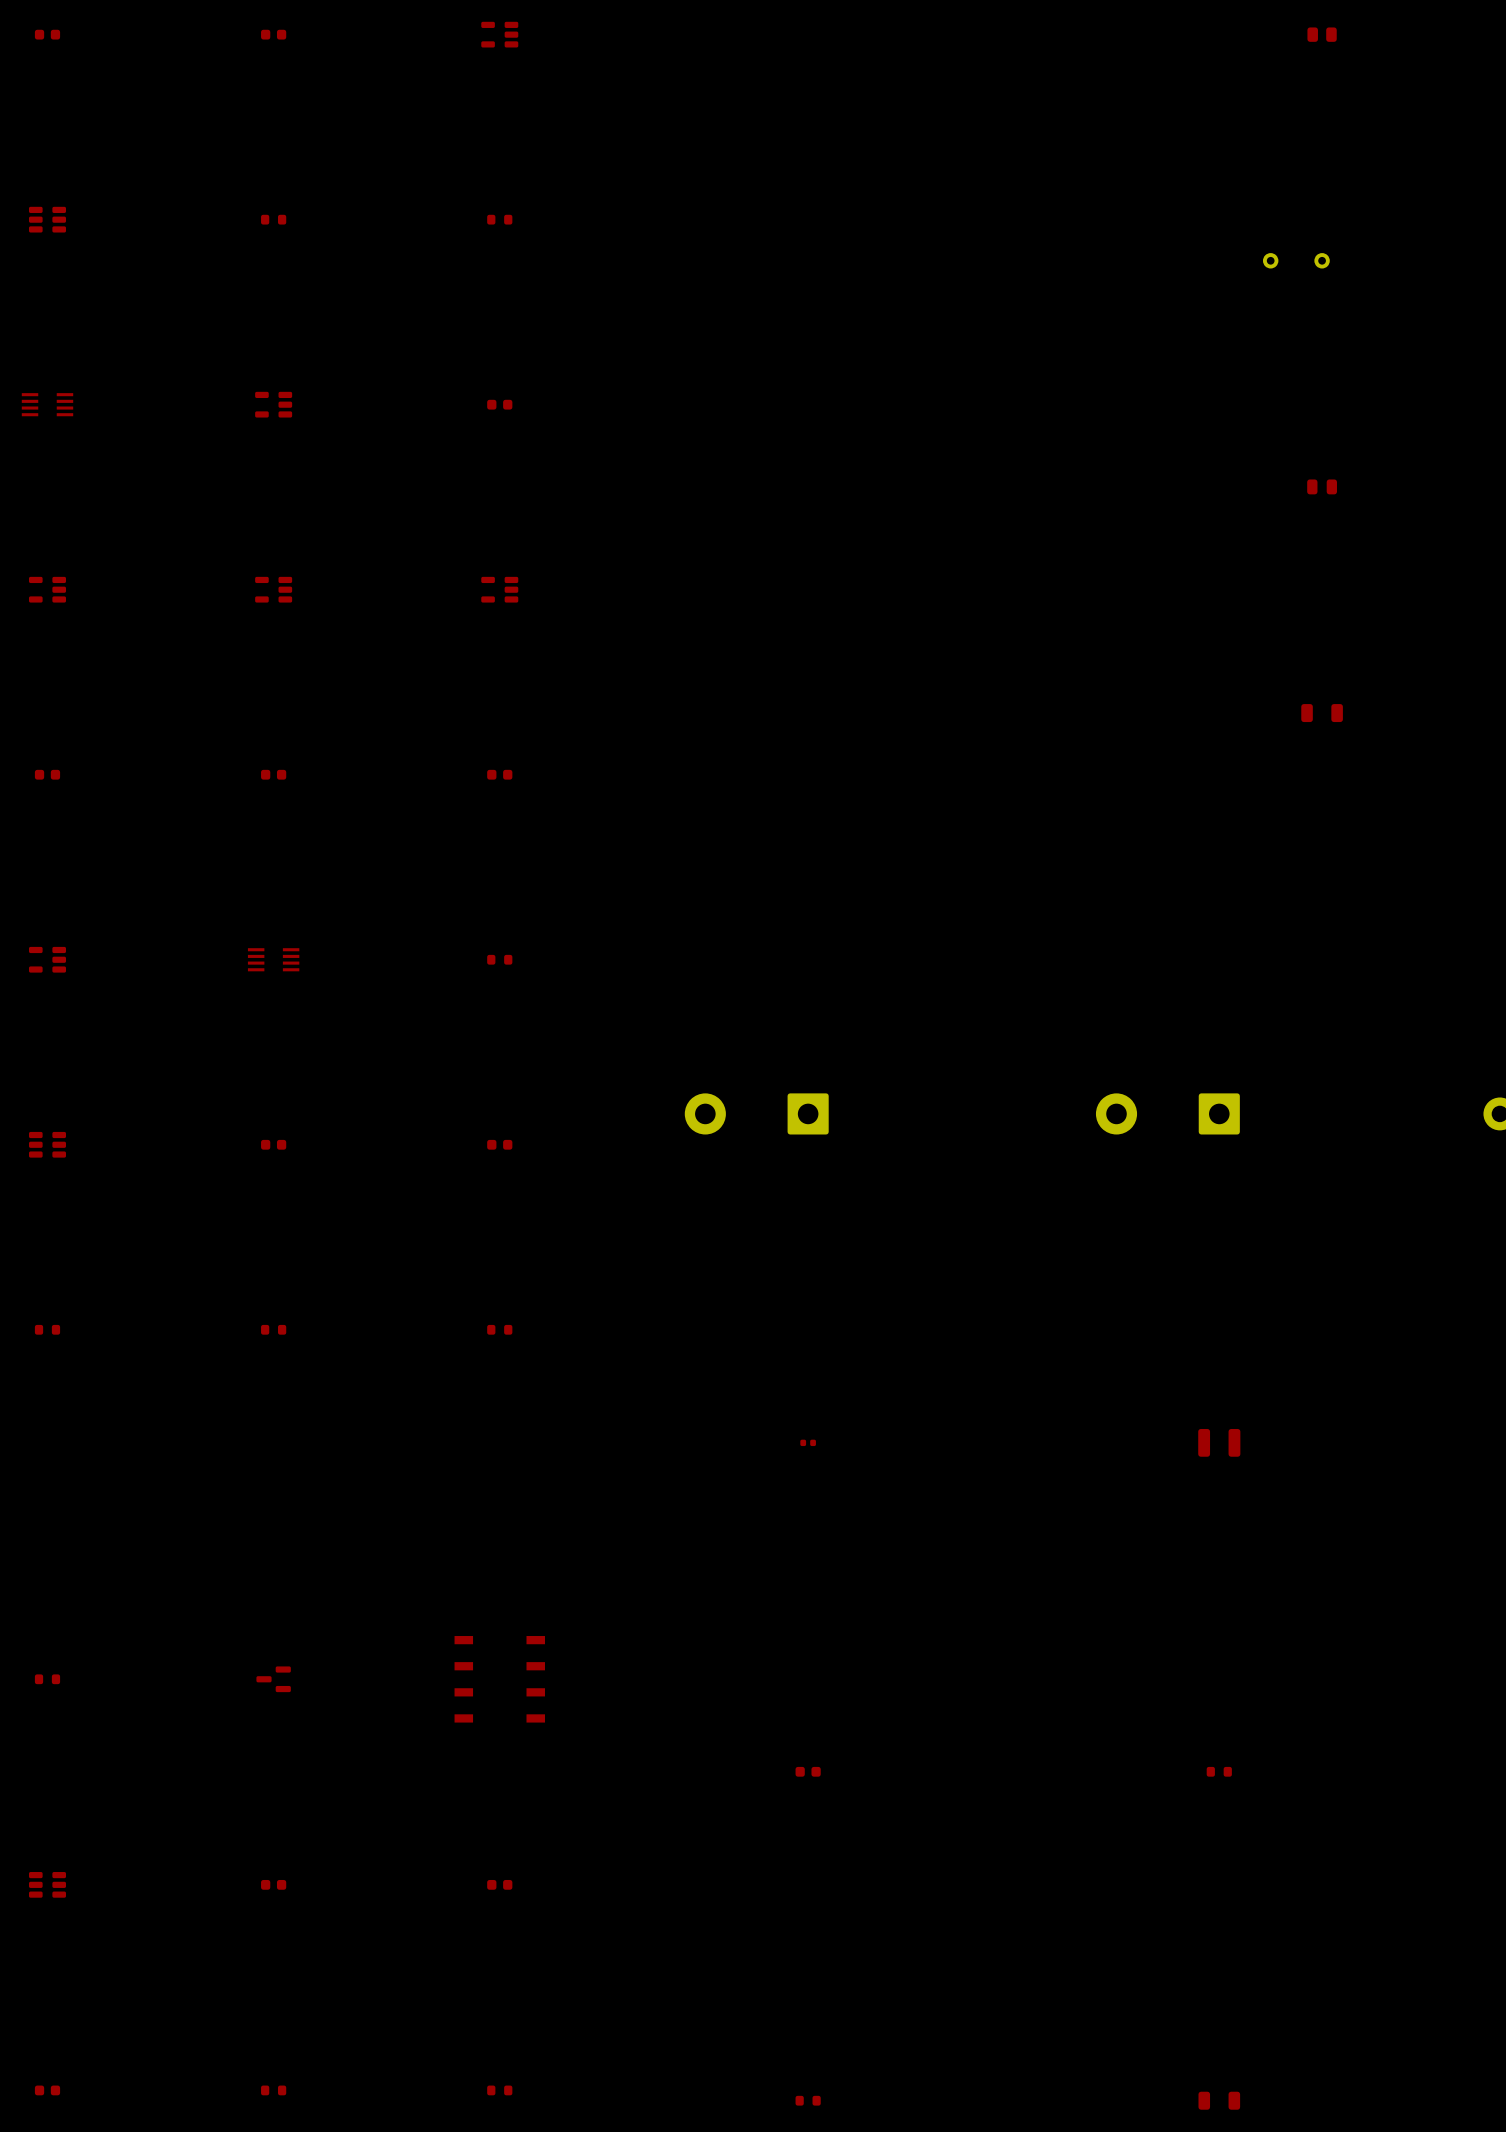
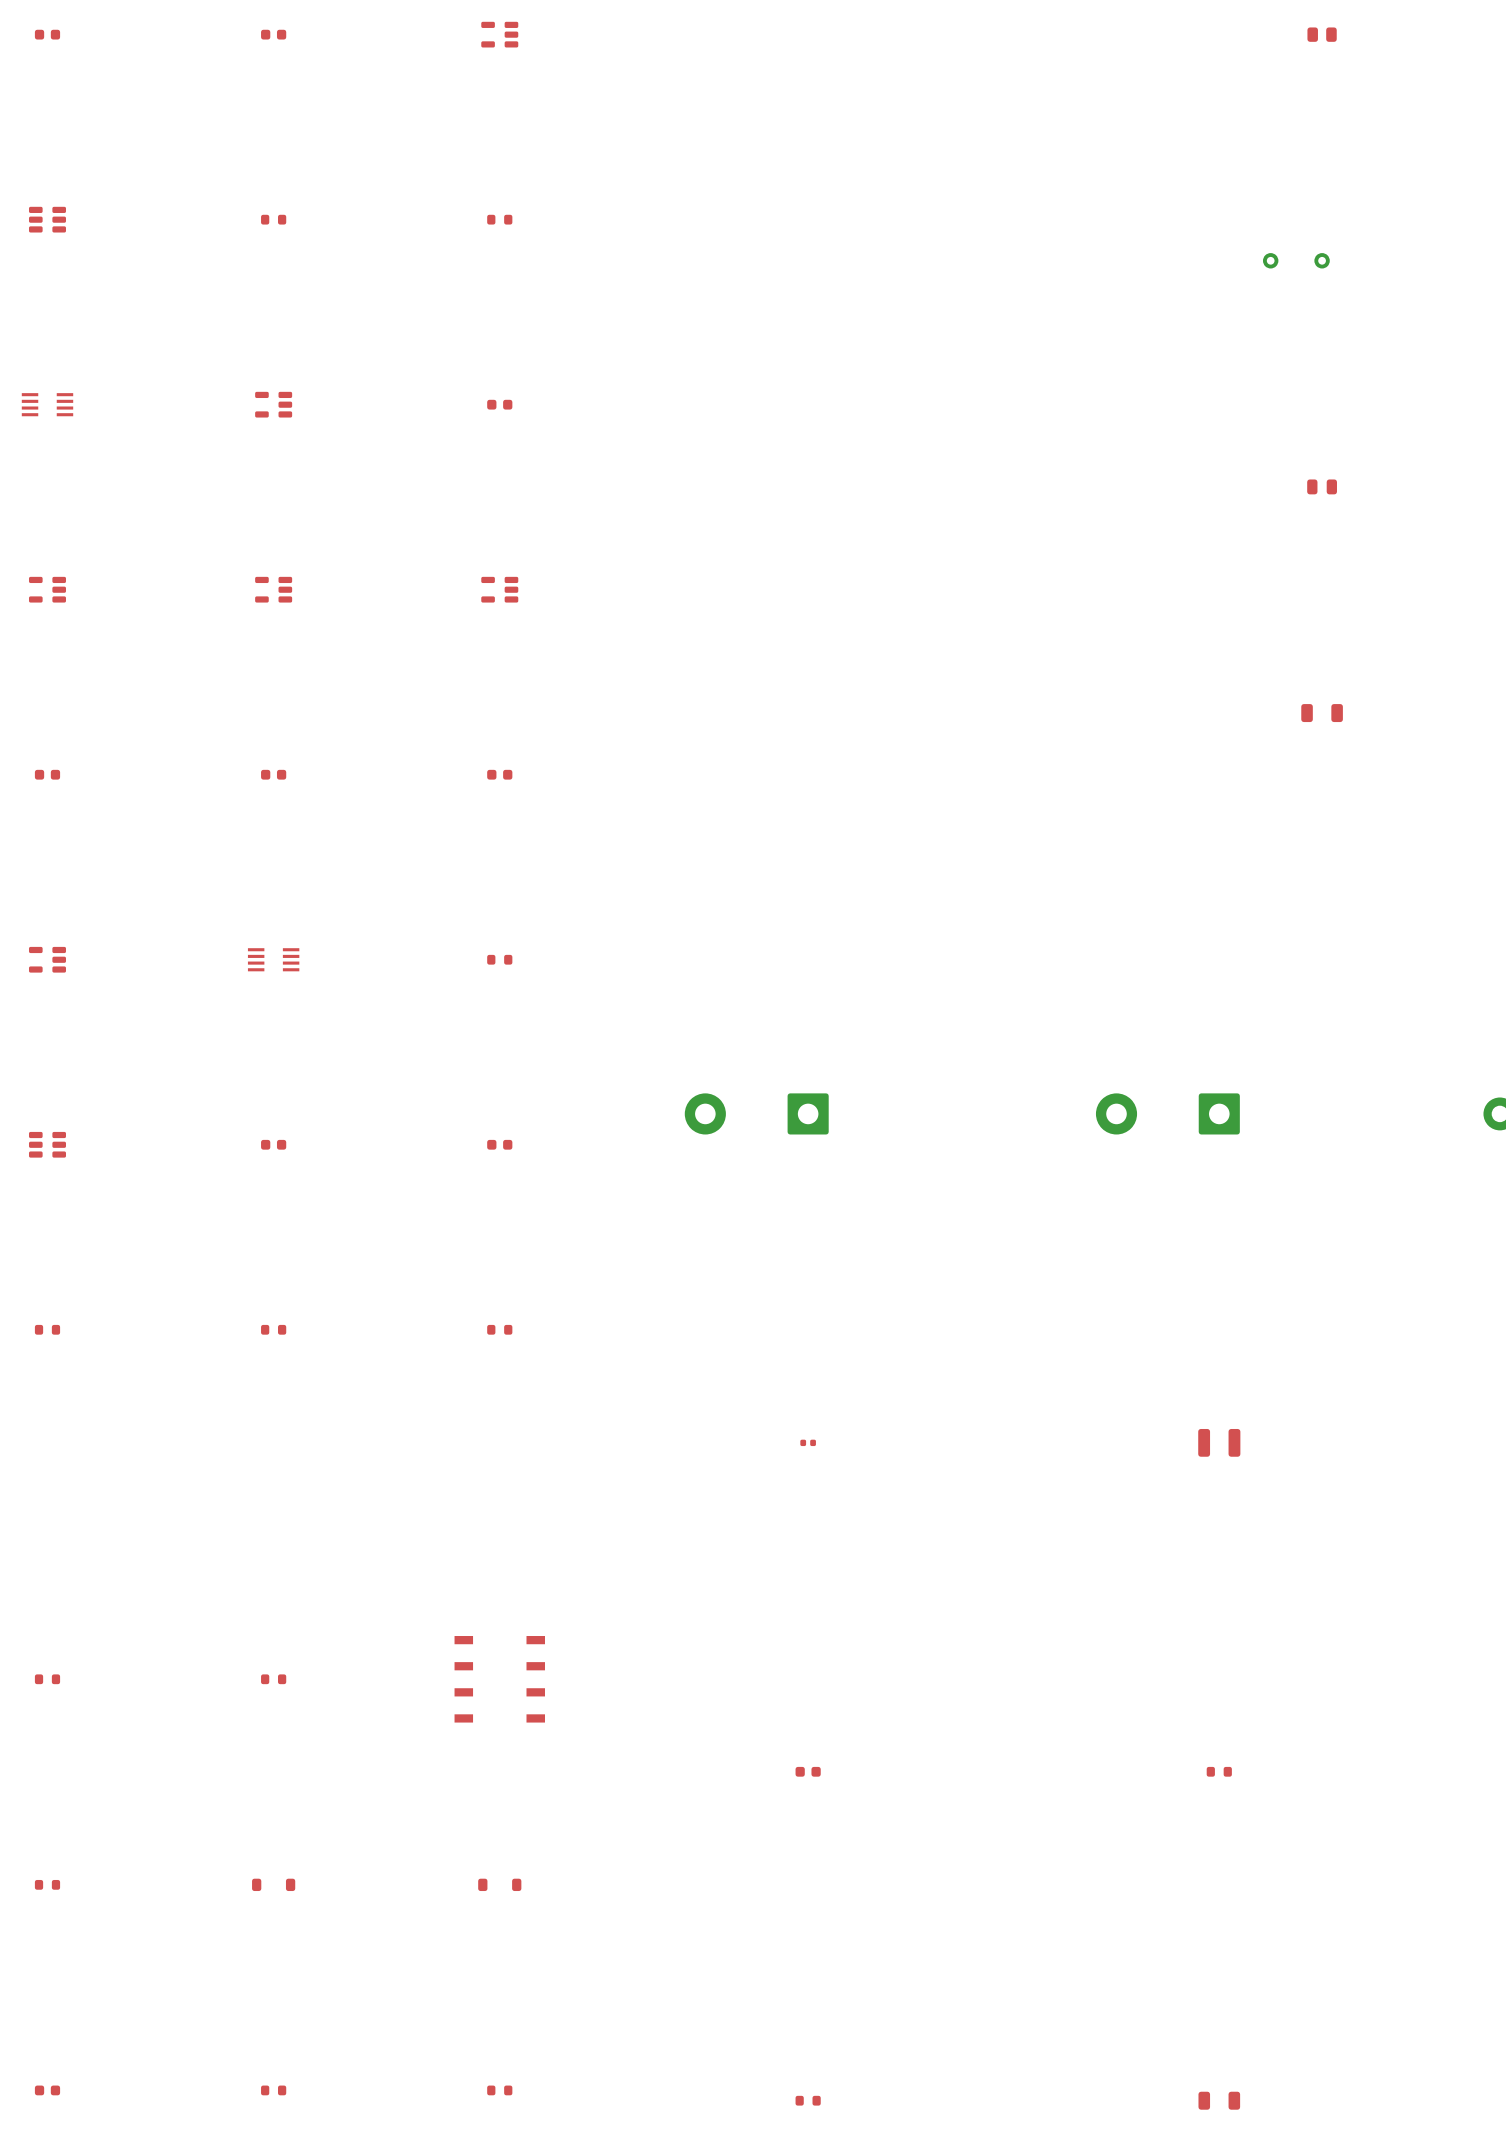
part footprint: [256, 1666, 291, 1693] -> [261, 1674, 287, 1685]
part footprint: [28, 1872, 66, 1898] -> [34, 1879, 61, 1890]
part footprint: [261, 1879, 287, 1890] -> [252, 1878, 296, 1892]
part footprint: [487, 1879, 513, 1890] -> [478, 1878, 522, 1892]

